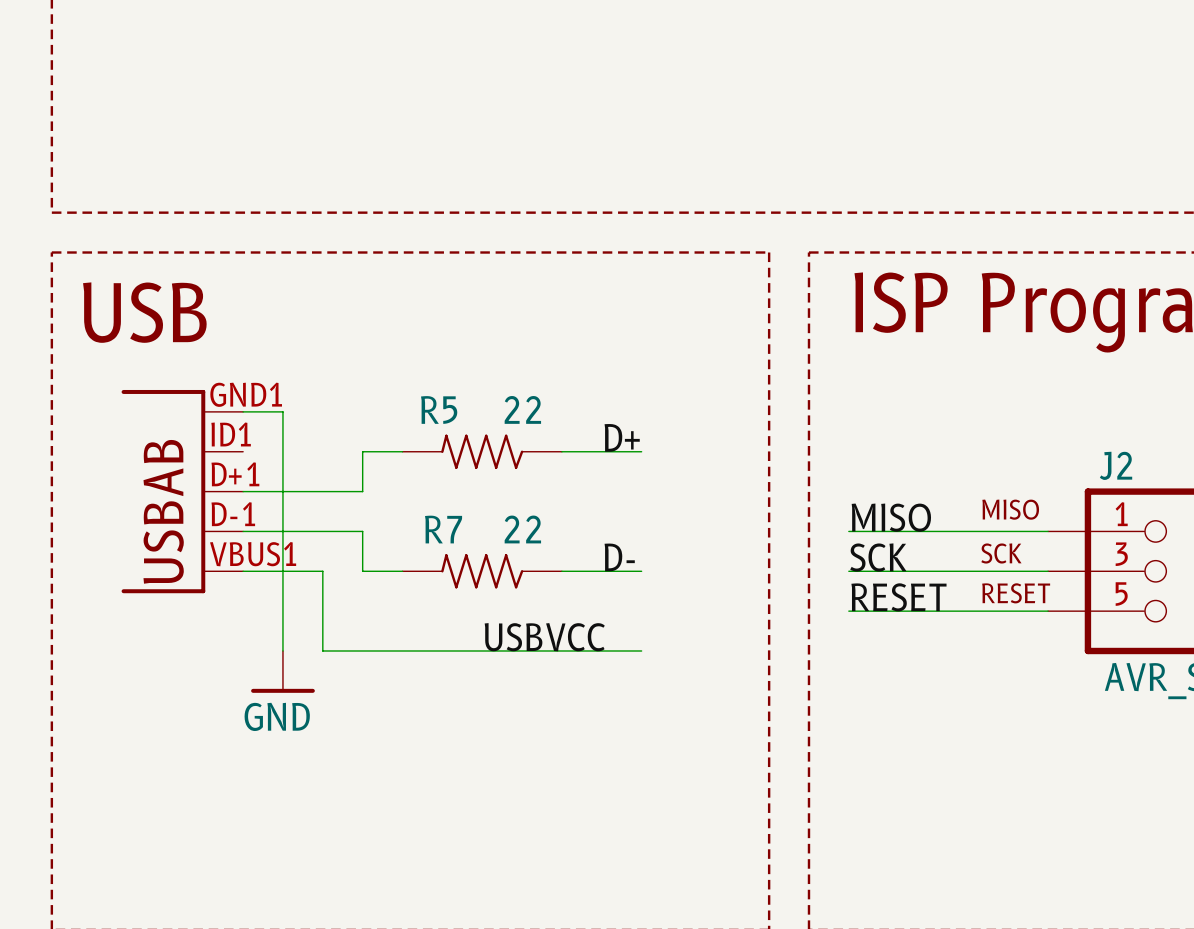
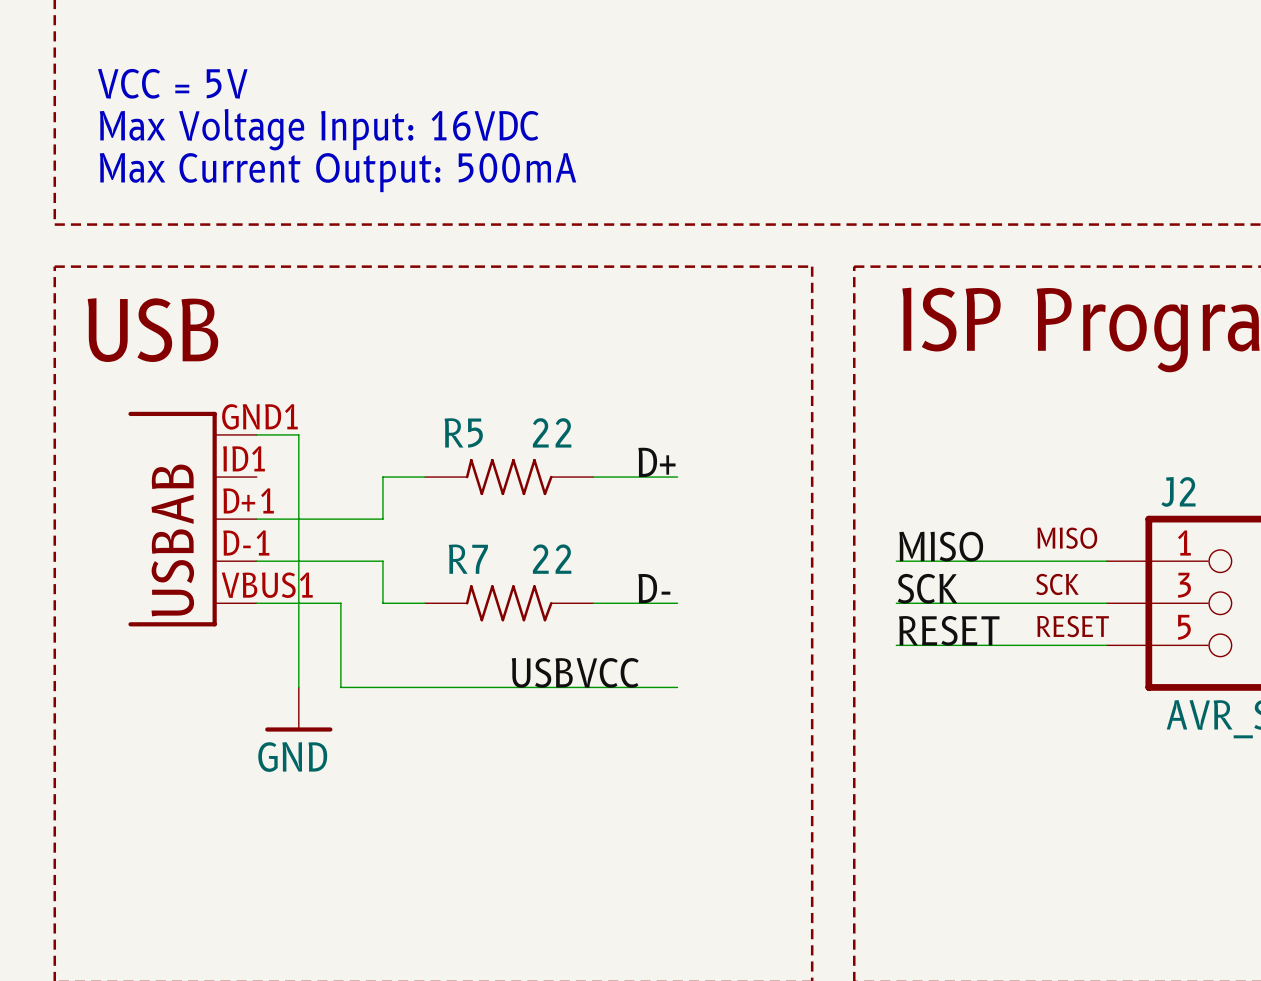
text: none -> VCC = 5V (172, 83)
text: none -> Max Voltage Input: 16VDC (319, 129)
text: none -> Max Current Output: 500mA (338, 172)

